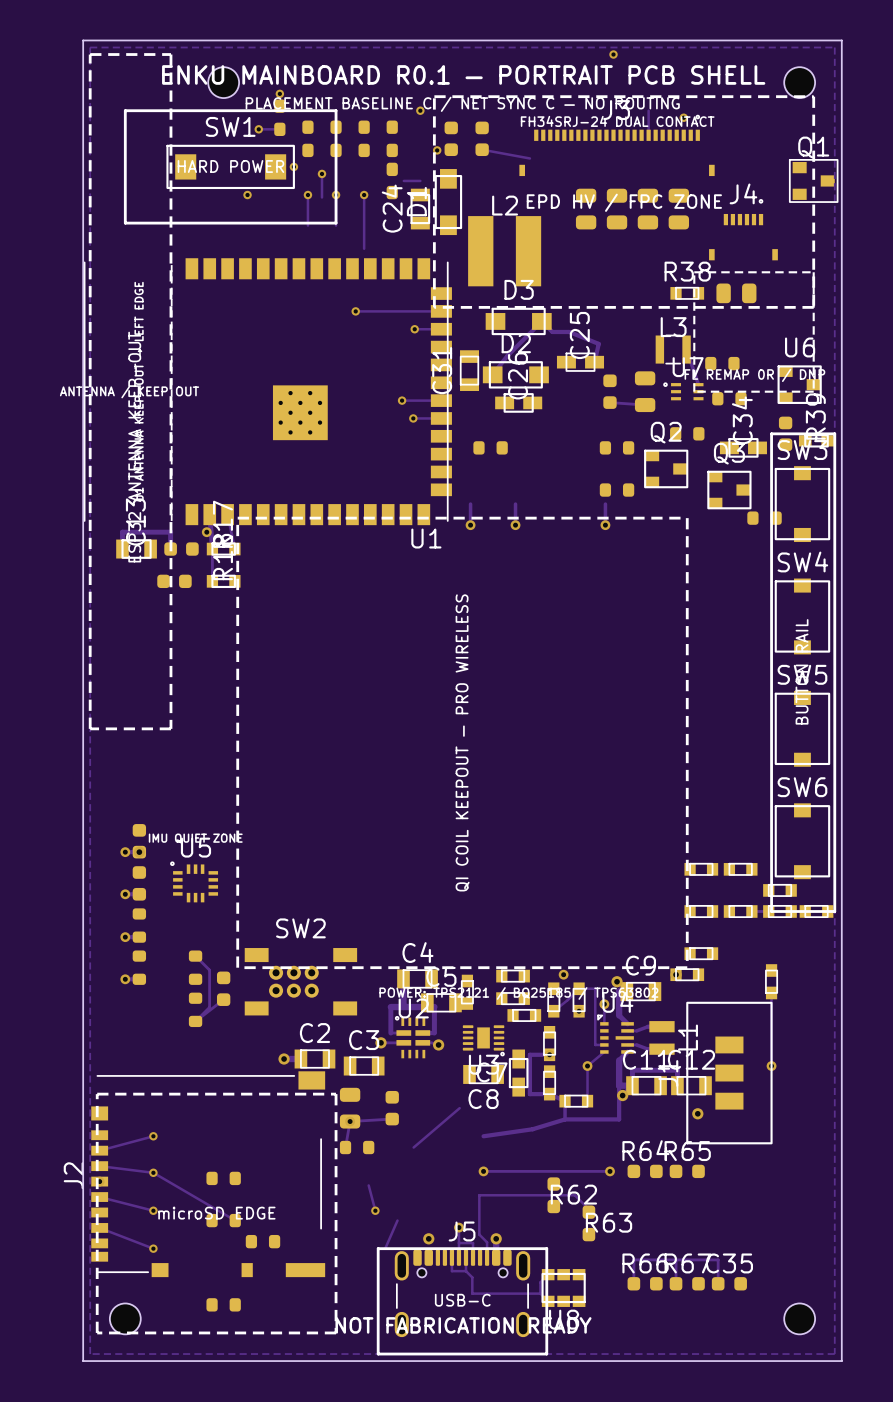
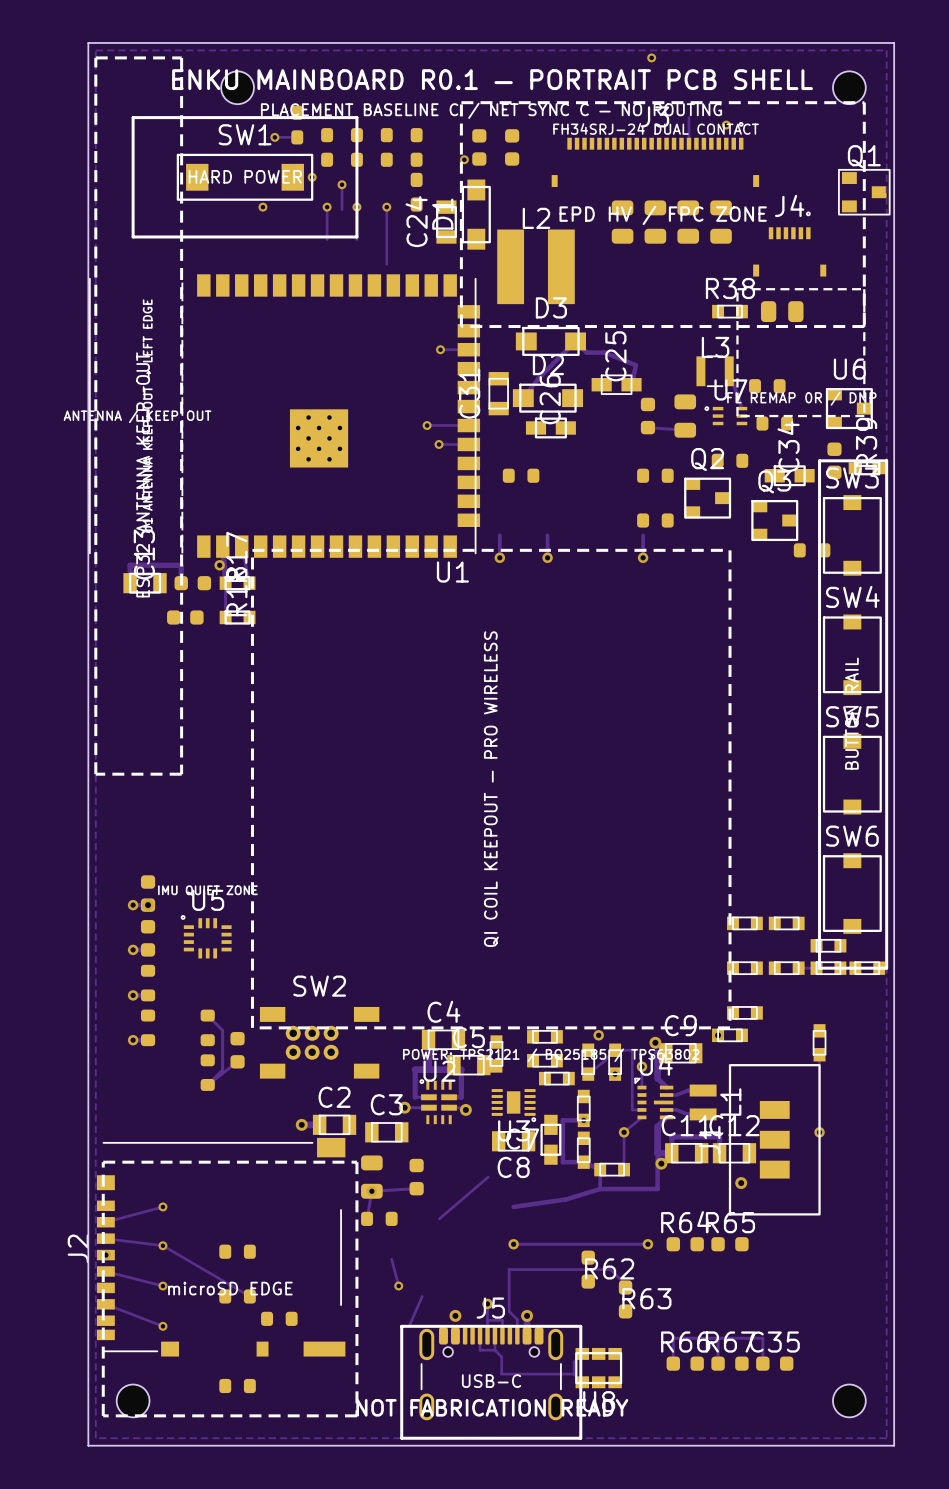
via: (279, 93) -> none
via: (420, 110) -> none
track: (482, 149) (529, 158) -> none
track: (403, 180) (420, 180) -> none
track: (355, 311) (441, 311) -> none
via: (355, 311) -> none

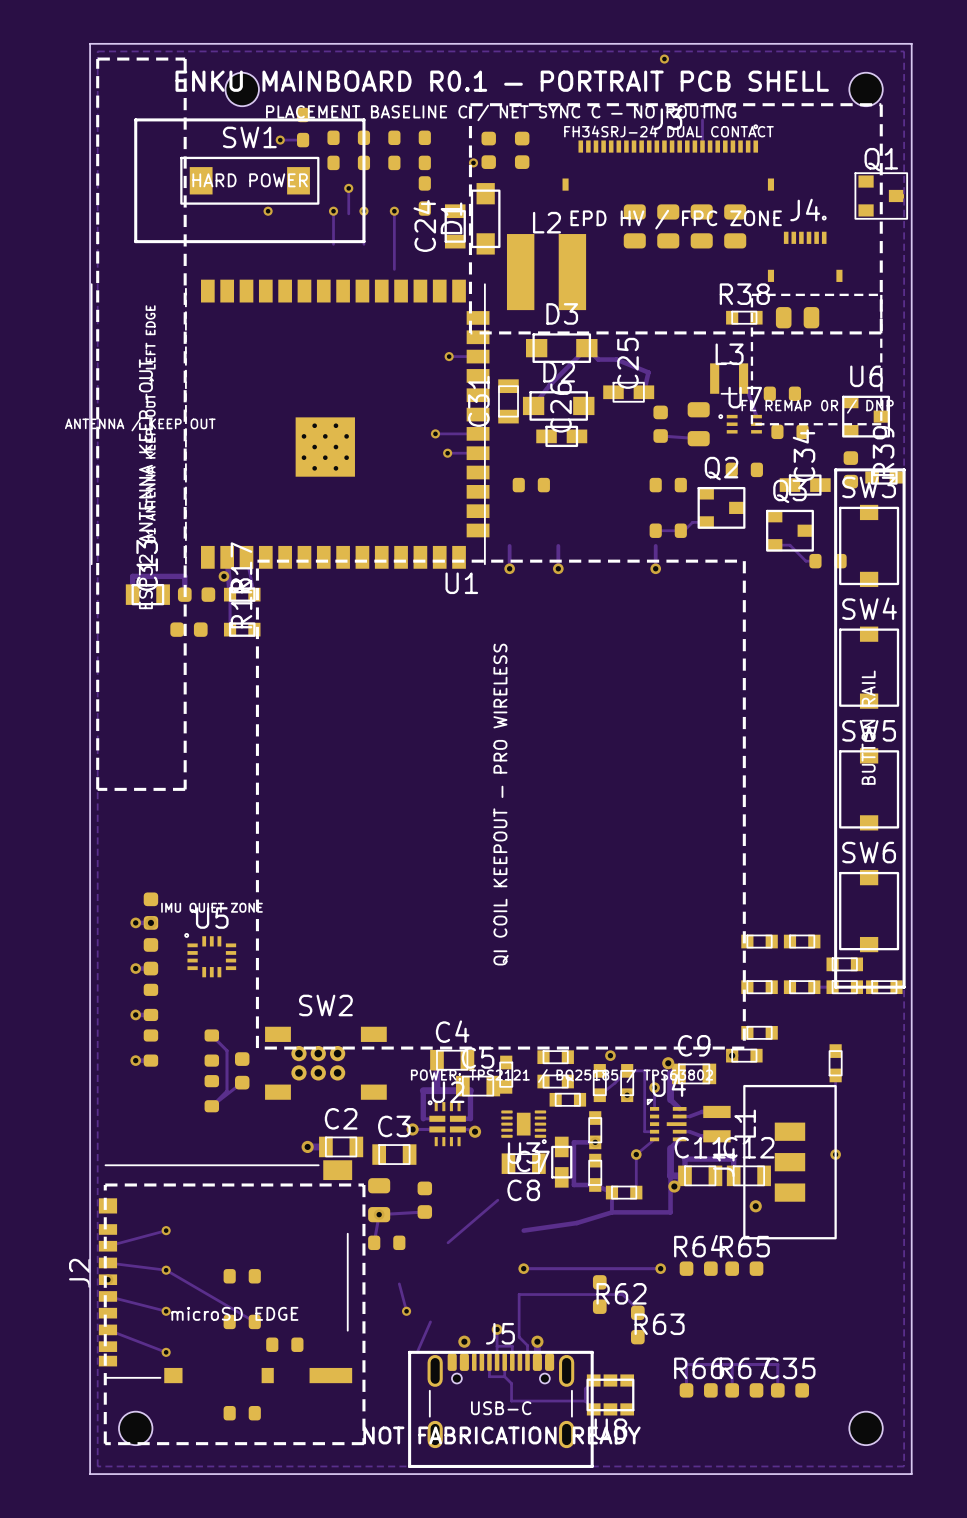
via: (726, 125) -> none
via: (312, 177) -> none
track: none -> (706, 522) (692, 522) (684, 530) (655, 530)
track: none -> (774, 545) (789, 545) (805, 561) (815, 561)

